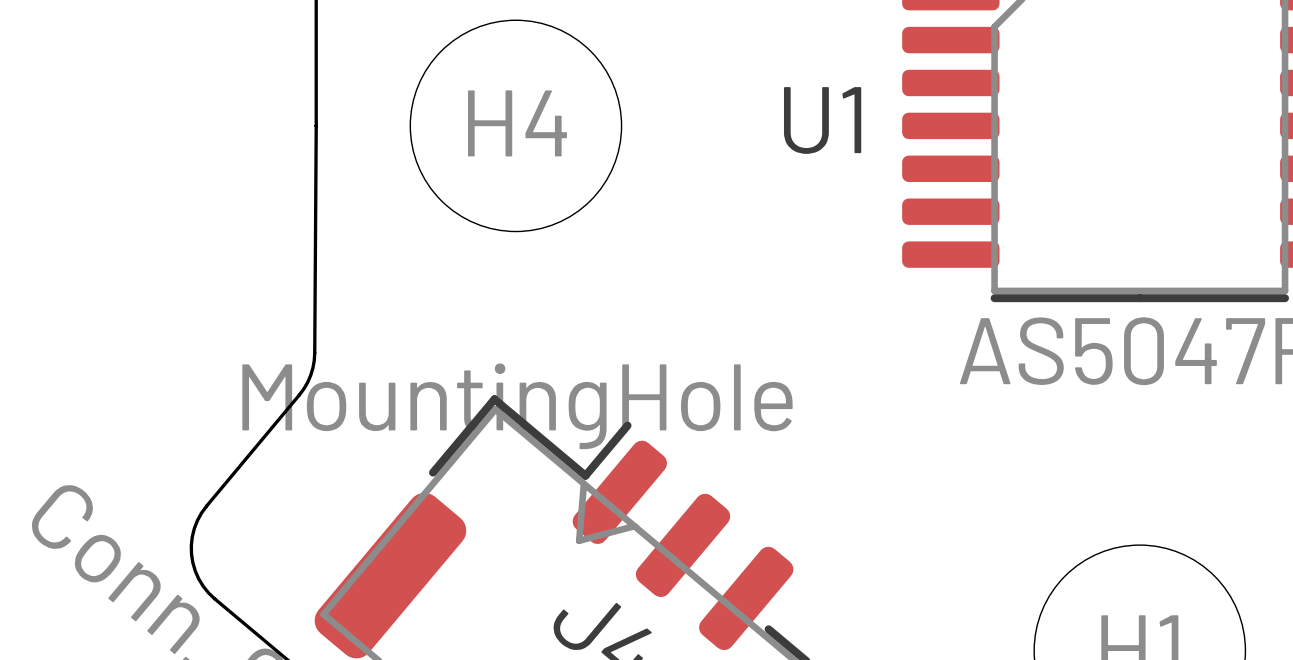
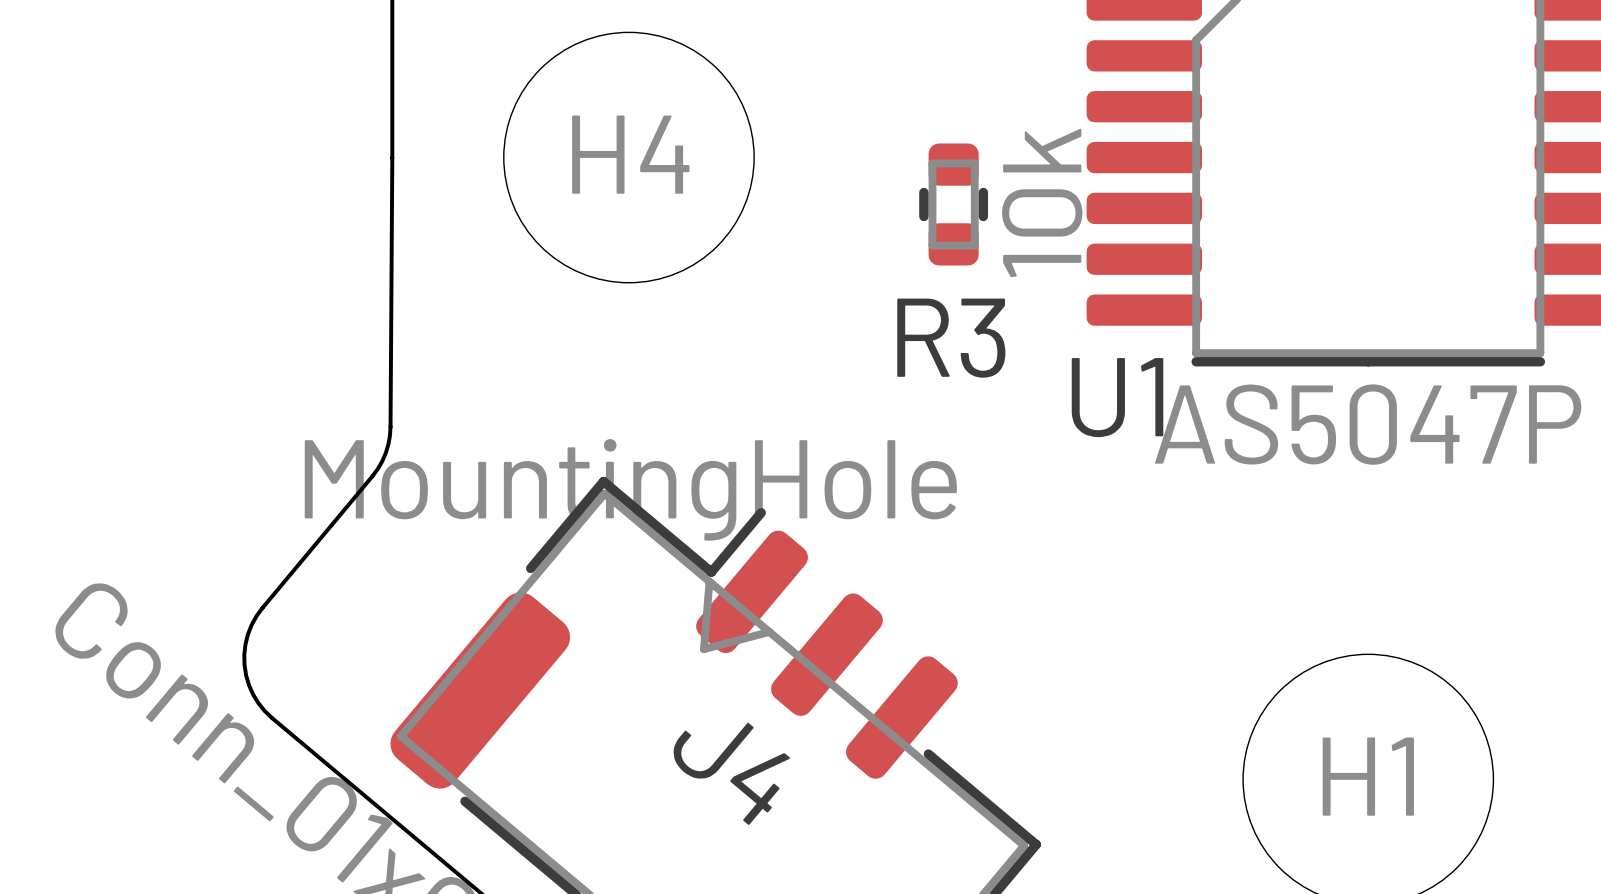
U1 name position: U1 (822, 120) -> U1 (1117, 397)
R3: none -> 10k (953, 204)

